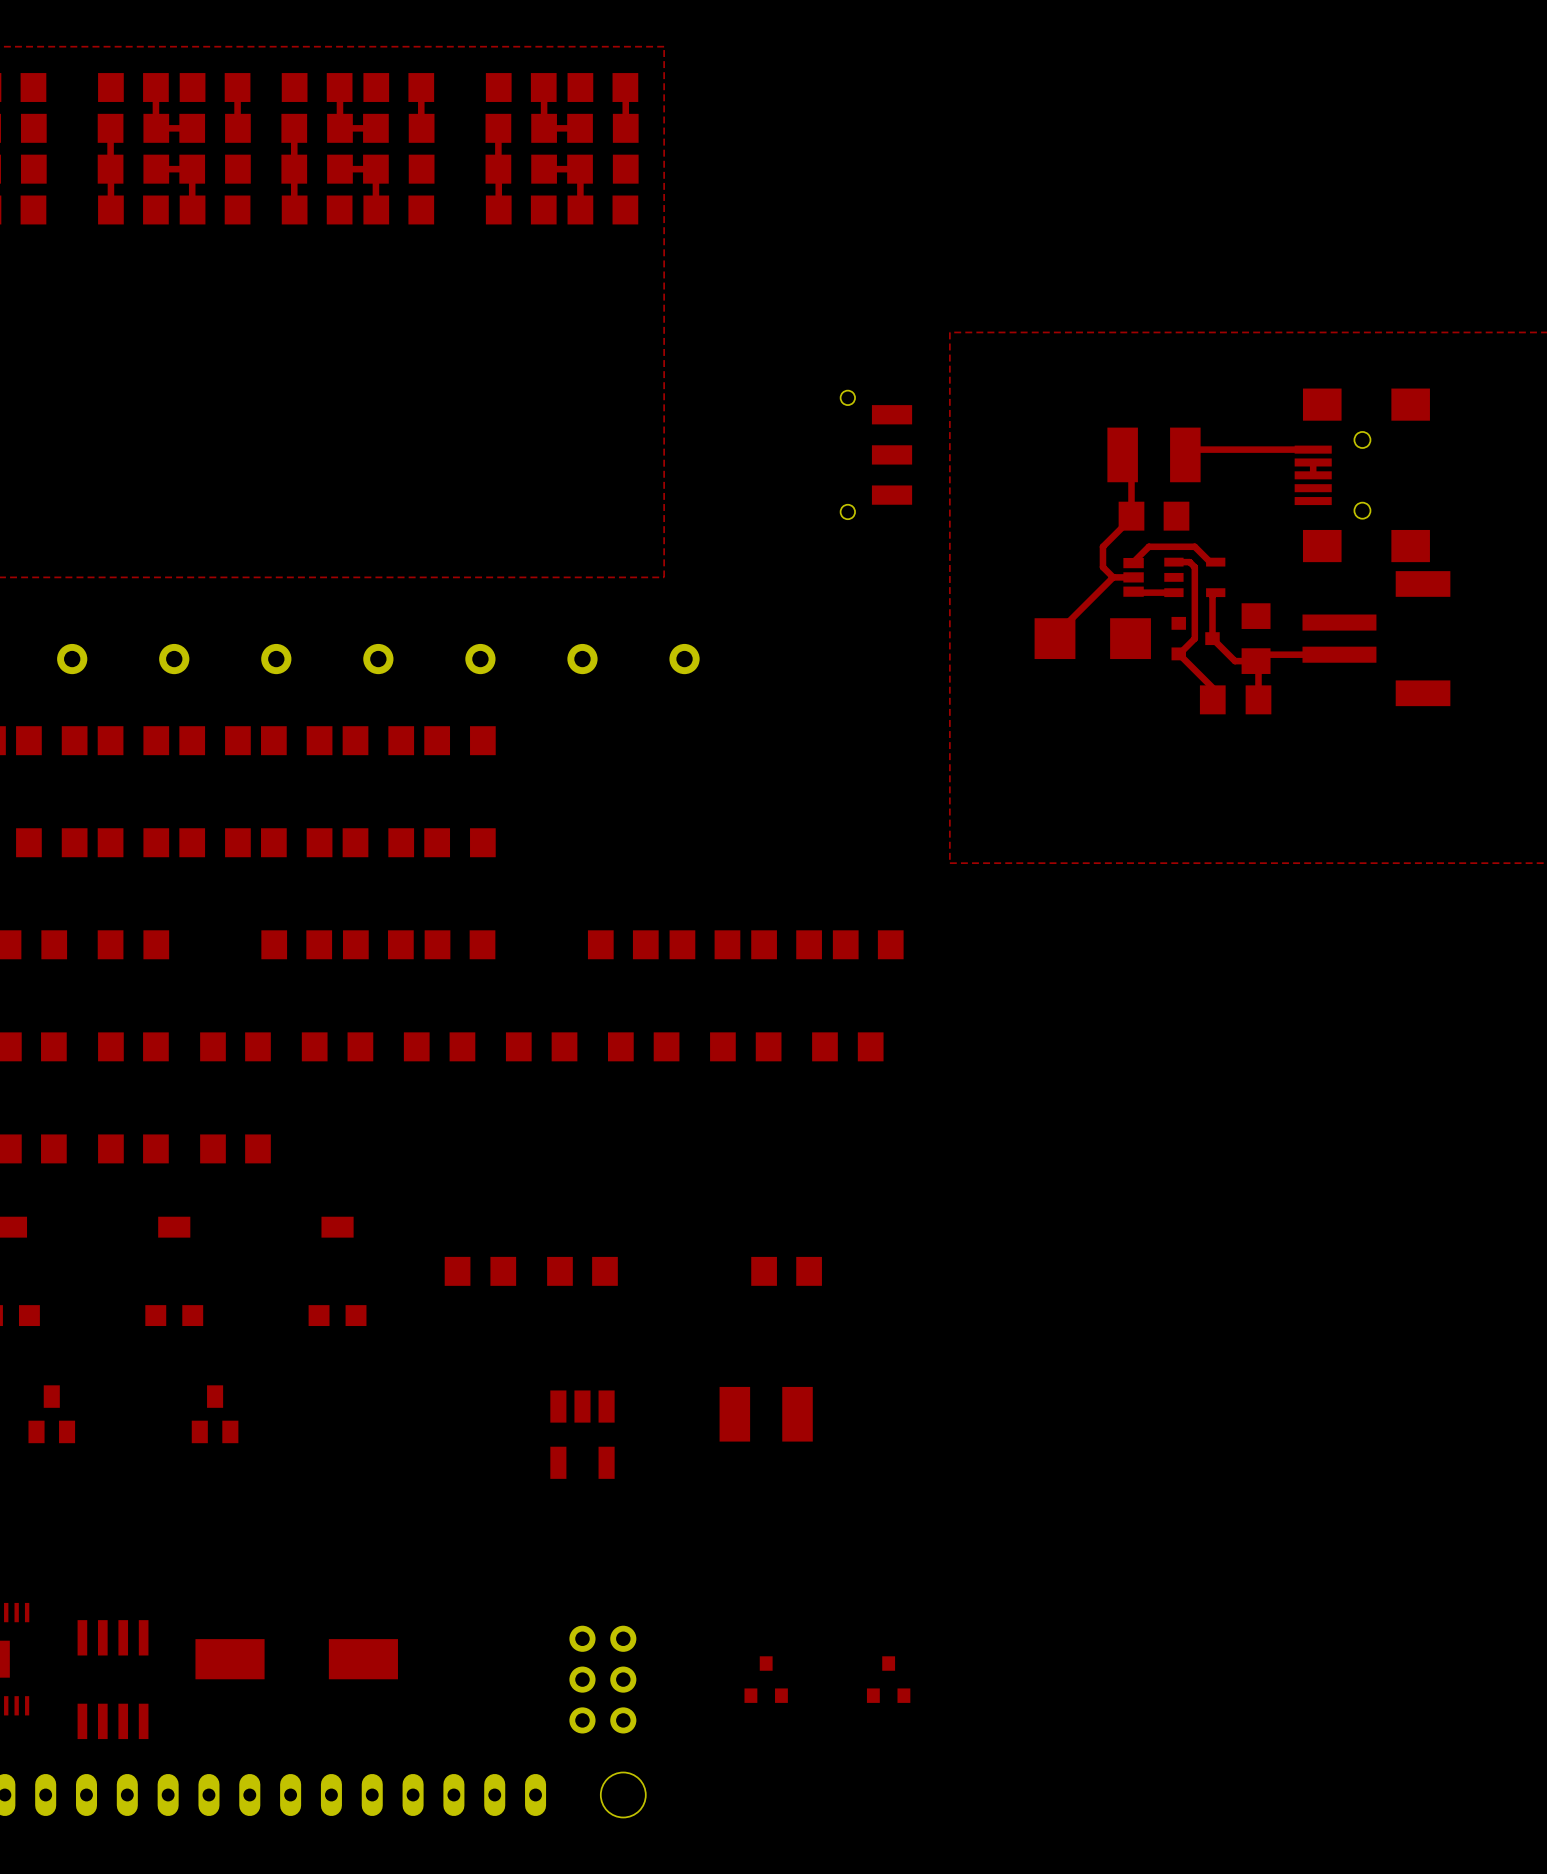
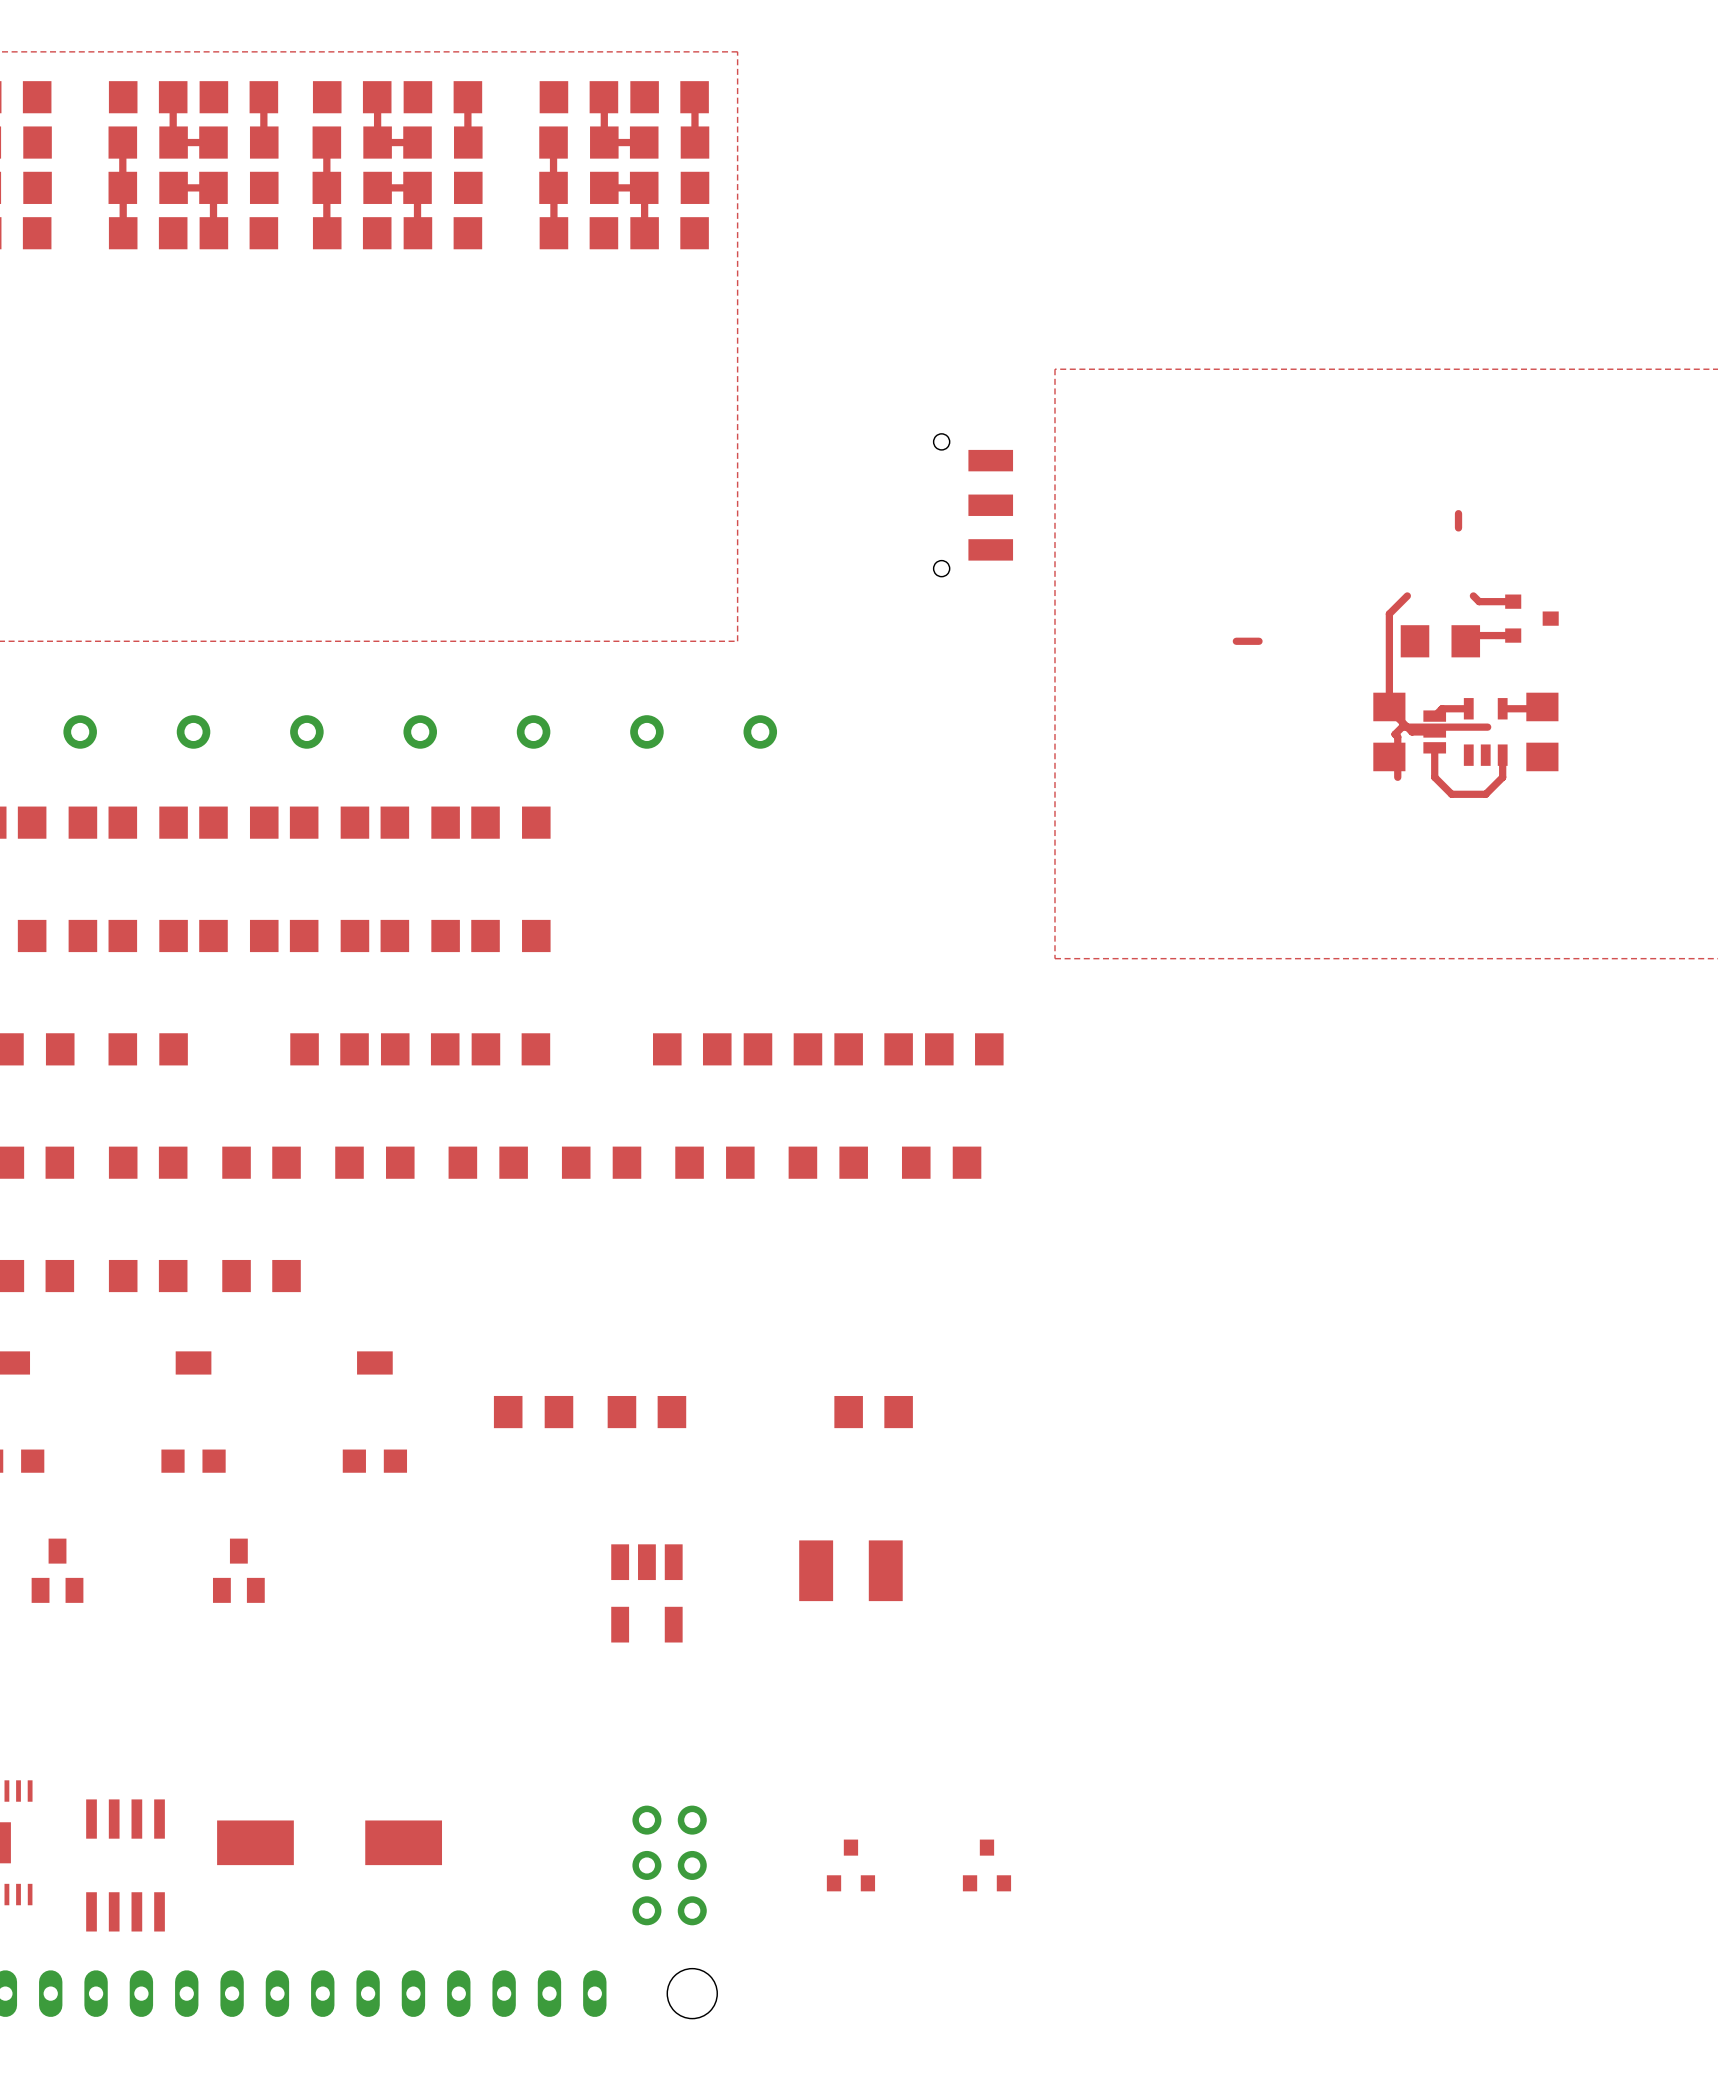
top track: (1313, 449) (1190, 449) (1185, 454) -> none
top track: (1122, 454) (1131, 463) (1131, 516) (1133, 516) (1102, 546) (1102, 567) (1113, 577) (1055, 635) (1055, 638) -> none
part: (1153, 454) -> none
part: (1362, 475) -> none
part: (1153, 516) -> none
top track: none -> (1407, 595) (1389, 613) (1389, 709) (1412, 731) (1434, 731)
top track: none -> (1473, 595) (1479, 601) (1513, 601)
top track: (1173, 562) (1189, 562) (1194, 567) (1194, 638) (1178, 653) (1215, 690) (1215, 699) (1212, 699) -> none
top track: (1215, 562) (1210, 562) (1194, 546) (1148, 546) (1133, 563) -> none
top track: none -> (1513, 635) (1471, 635) (1465, 641)
part position: (1133, 577) -> (1434, 731)
part rotation: 0° (1194, 577) -> 90° counterclockwise (1485, 731)
part position: (1194, 577) -> (1485, 731)
top track: (1133, 591) (1173, 592) -> none
top track: (1215, 592) (1212, 595) (1212, 638) (1235, 661) (1256, 661) -> none
top track: none -> (1542, 706) (1540, 708) (1502, 708)
part: (1092, 638) -> none
part position: (1195, 638) -> (1531, 618)
part position: (1256, 638) -> (1389, 731)
top track: none -> (1468, 708) (1442, 708) (1434, 716)
part: (1376, 638) -> none
part: none -> (1542, 731)
top track: none -> (1434, 747) (1434, 777) (1451, 794) (1485, 794) (1502, 777) (1502, 755)
part position: (1235, 699) -> (1440, 641)

